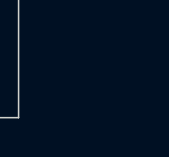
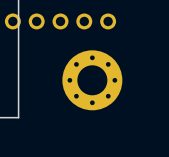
part: none -> (12, 21)
part: none -> (36, 21)
part: none -> (60, 21)
part: none -> (84, 21)
part: none -> (108, 21)
part: none -> (92, 80)

